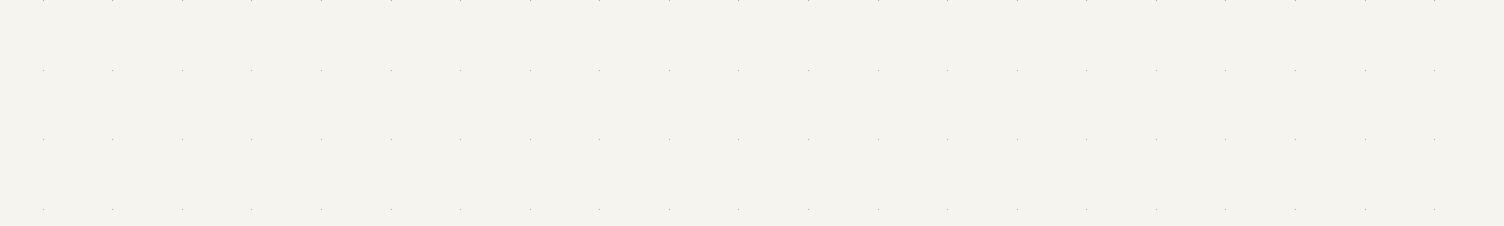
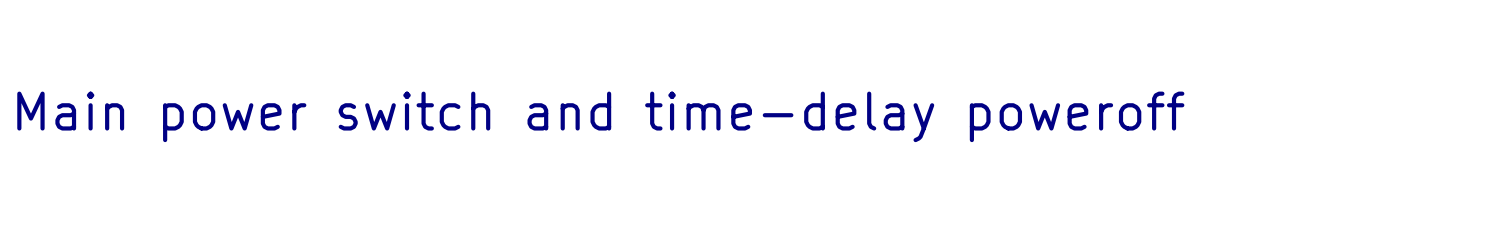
text: none -> Main power switch and time-delay poweroff (600, 116)

